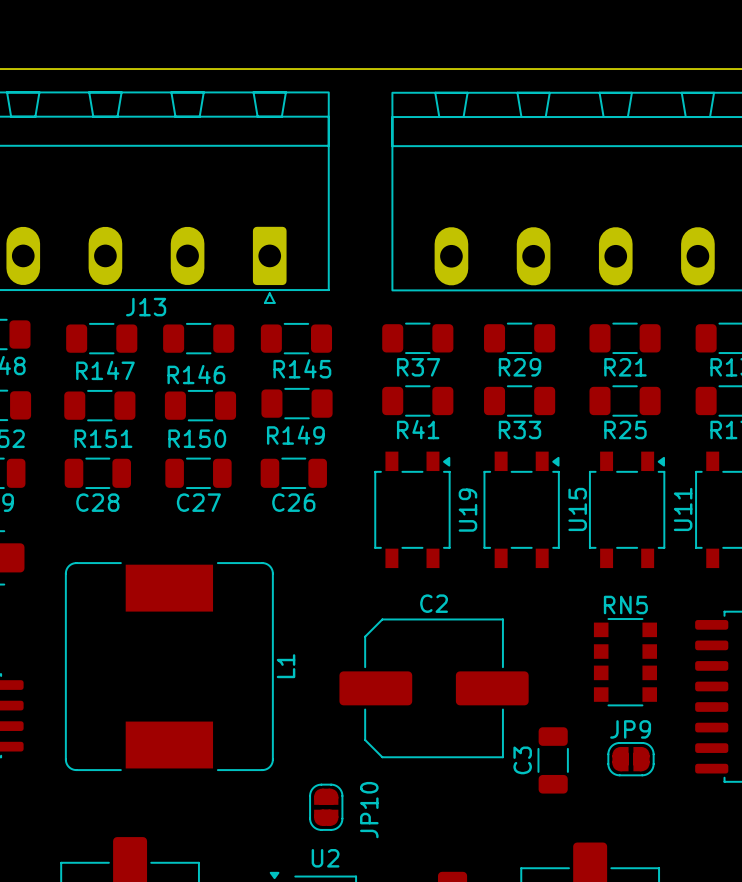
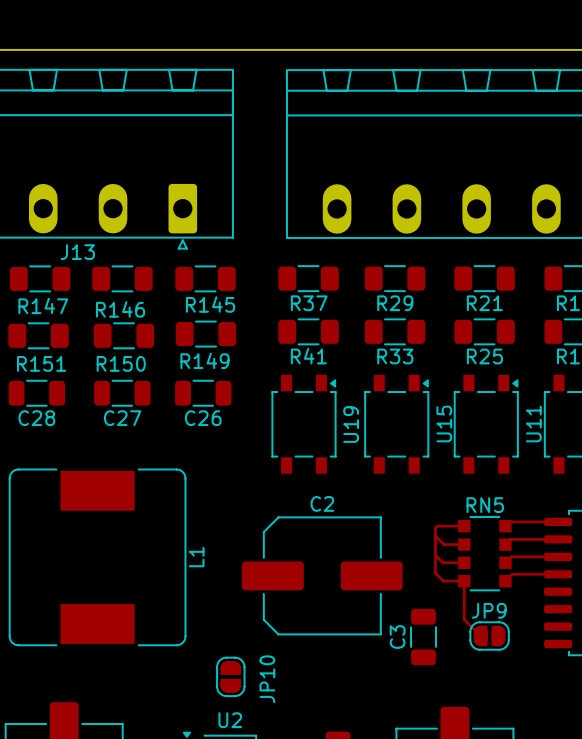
track: none -> (558, 521) (509, 521) (505, 526)
track: none -> (464, 526) (437, 526) (435, 527) (435, 573) (443, 581) (464, 581) (464, 619) (480, 636)
track: none -> (435, 536) (443, 544) (464, 544)
track: none -> (558, 539) (510, 539) (505, 544)
track: none -> (435, 555) (442, 562) (464, 562)
track: none -> (558, 556) (511, 556) (505, 562)
track: none -> (558, 574) (512, 574) (505, 581)

